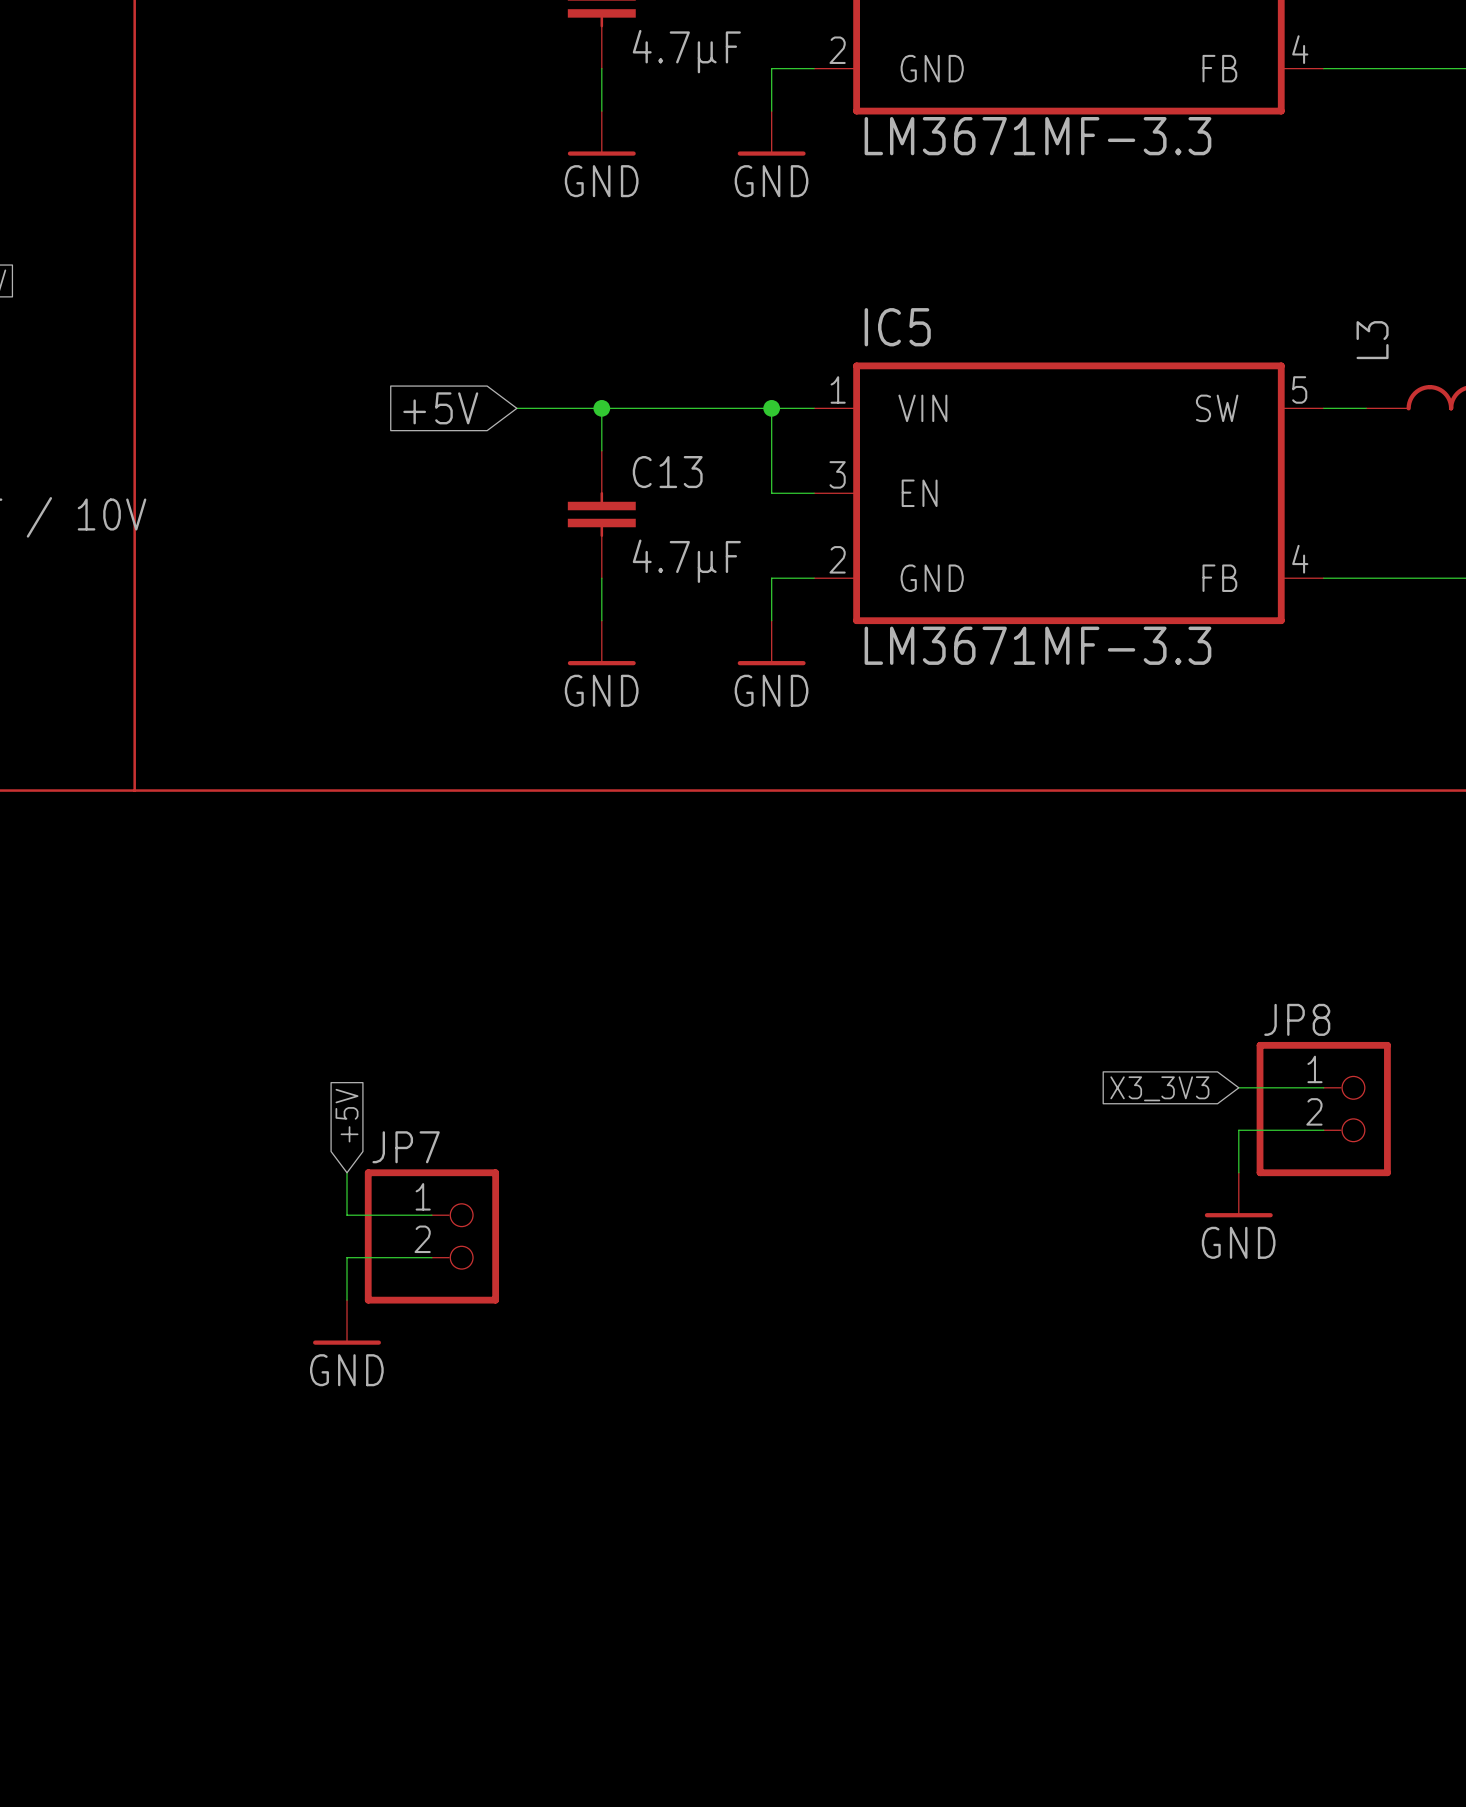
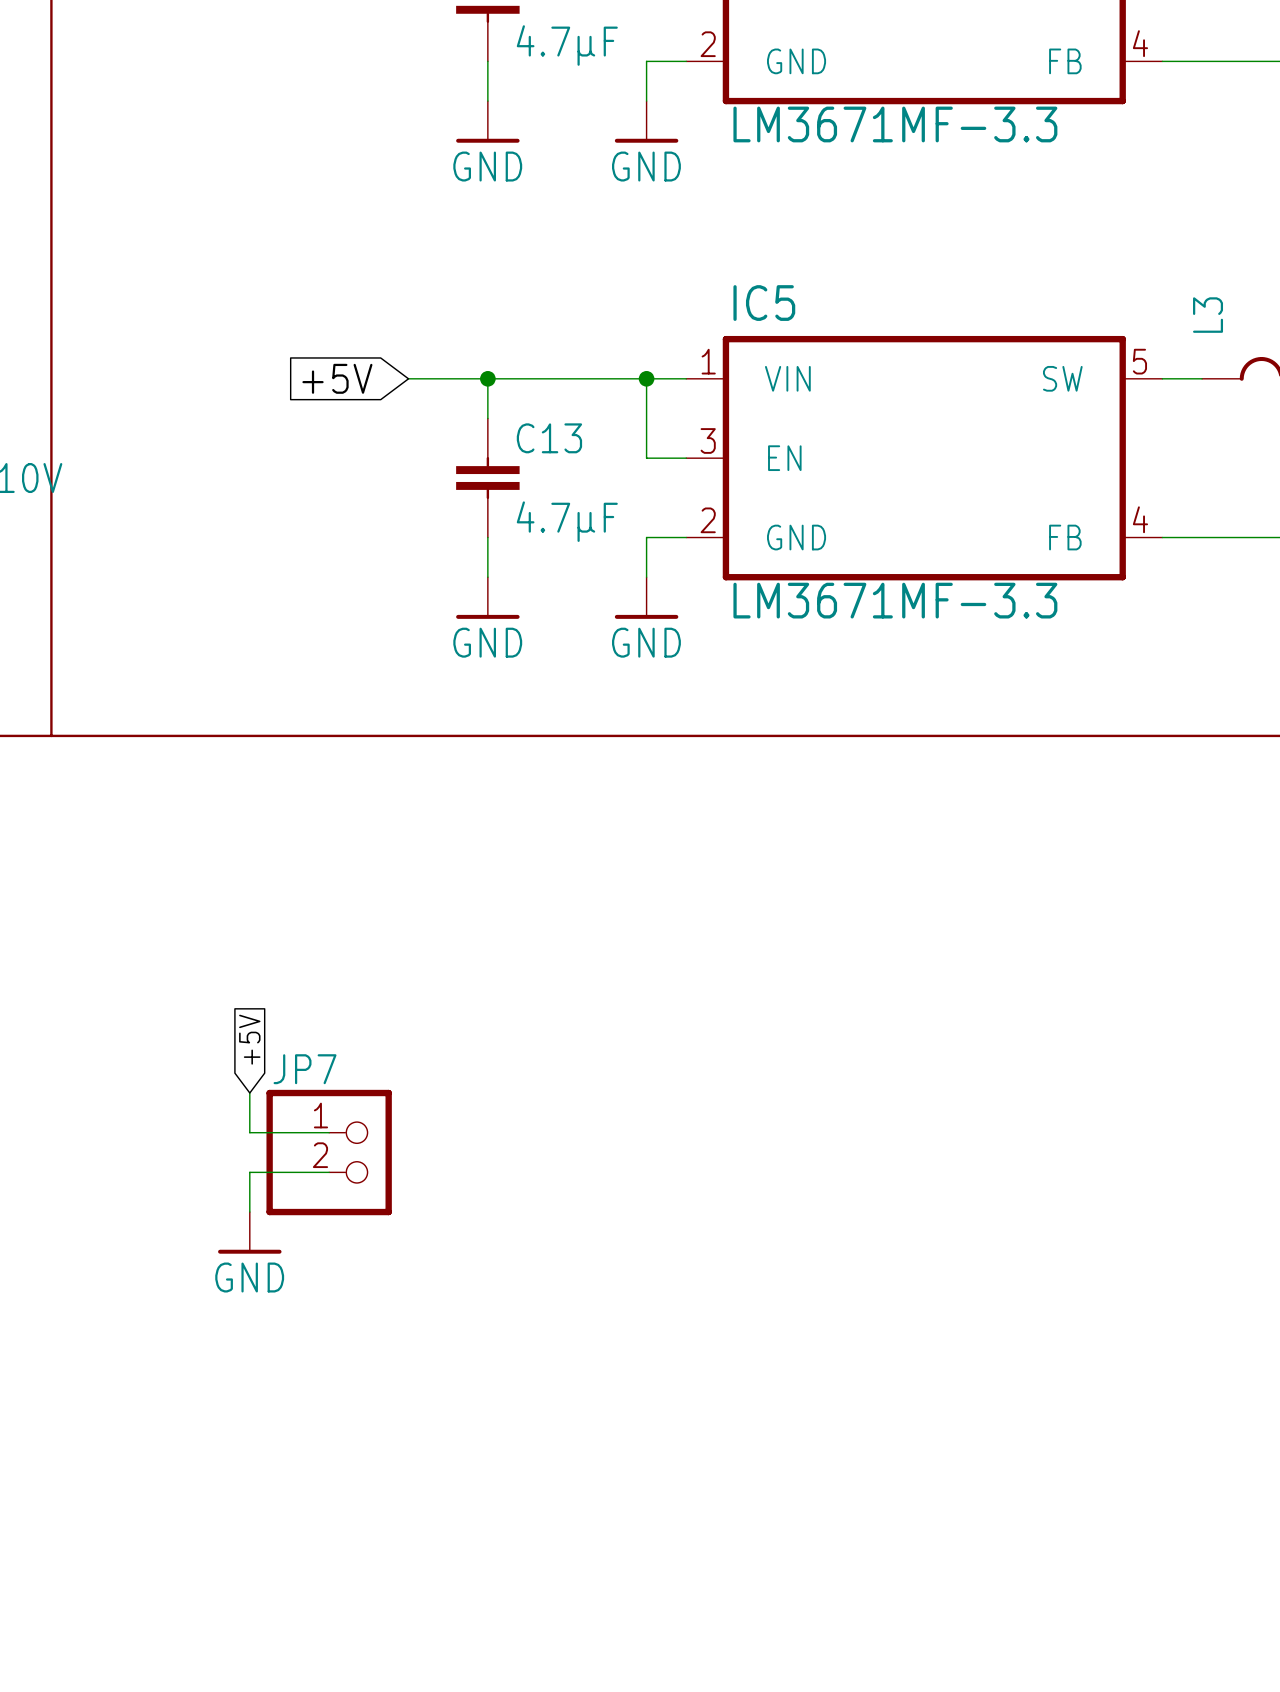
wire: (1238, 1087) (1323, 1087) -> none
global label: X3_3V3 (1159, 1088) -> none
JP8: (1323, 1109) -> none
wire: (1323, 1130) (1238, 1130) (1238, 1172) -> none
power symbol: GND (1238, 1195) -> none

